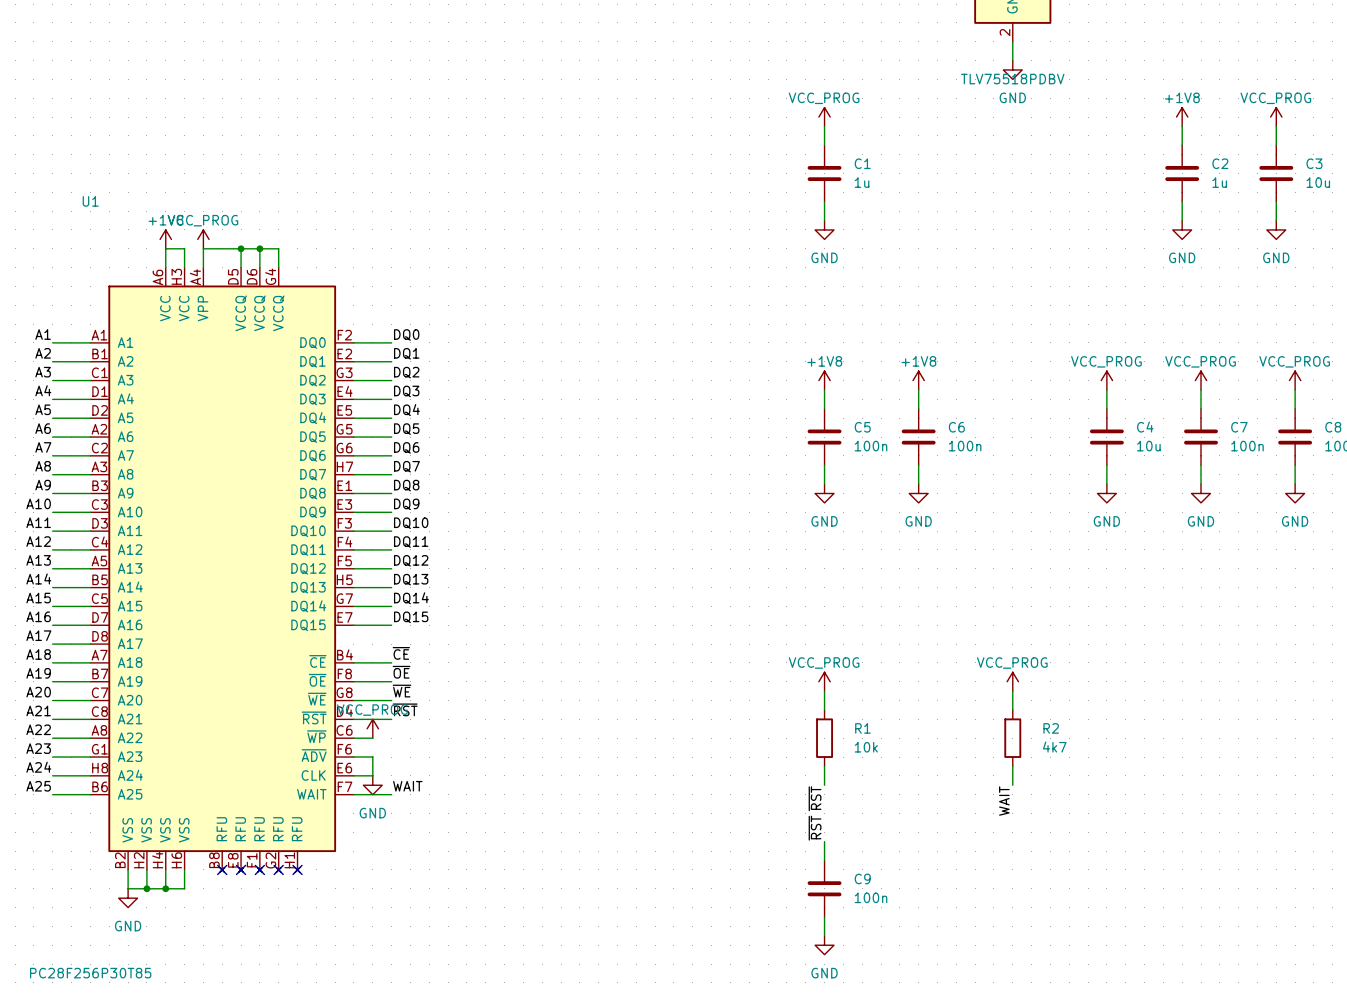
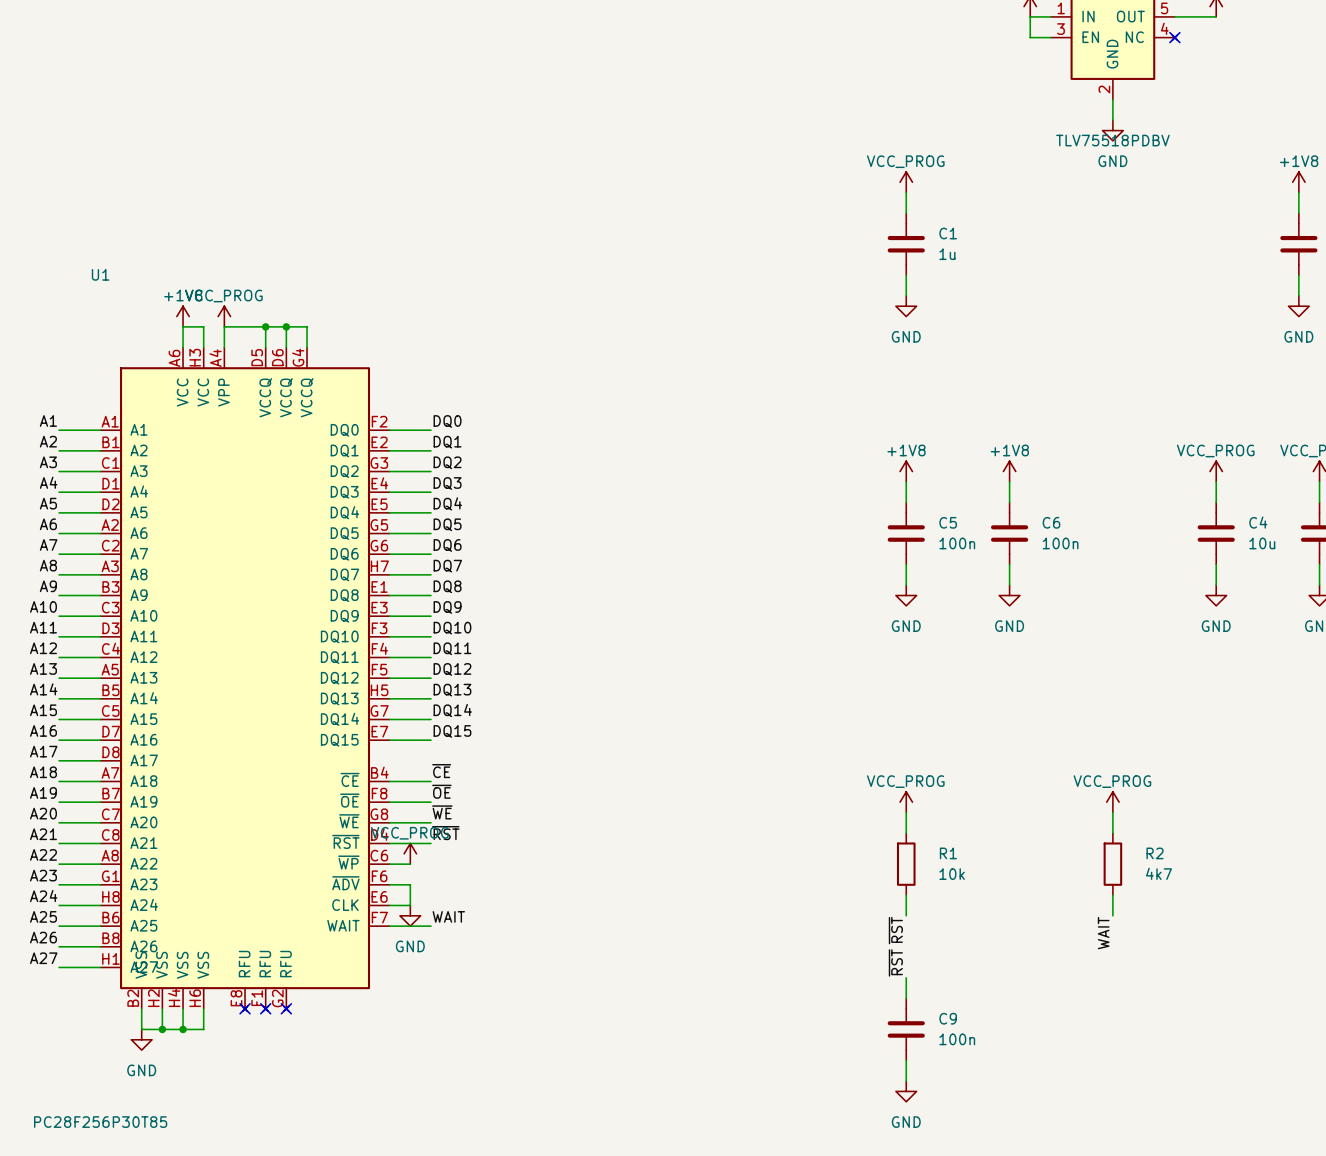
U1 symbol: [90, 267, 354, 873] -> [100, 347, 390, 1012]
label: none -> A26 (43, 937)
wire: none -> (59, 946) (100, 946)
label: none -> A27 (43, 958)
wire: none -> (59, 967) (100, 967)
no-connect mark: (278, 869) -> none
no-connect mark: (297, 869) -> none

